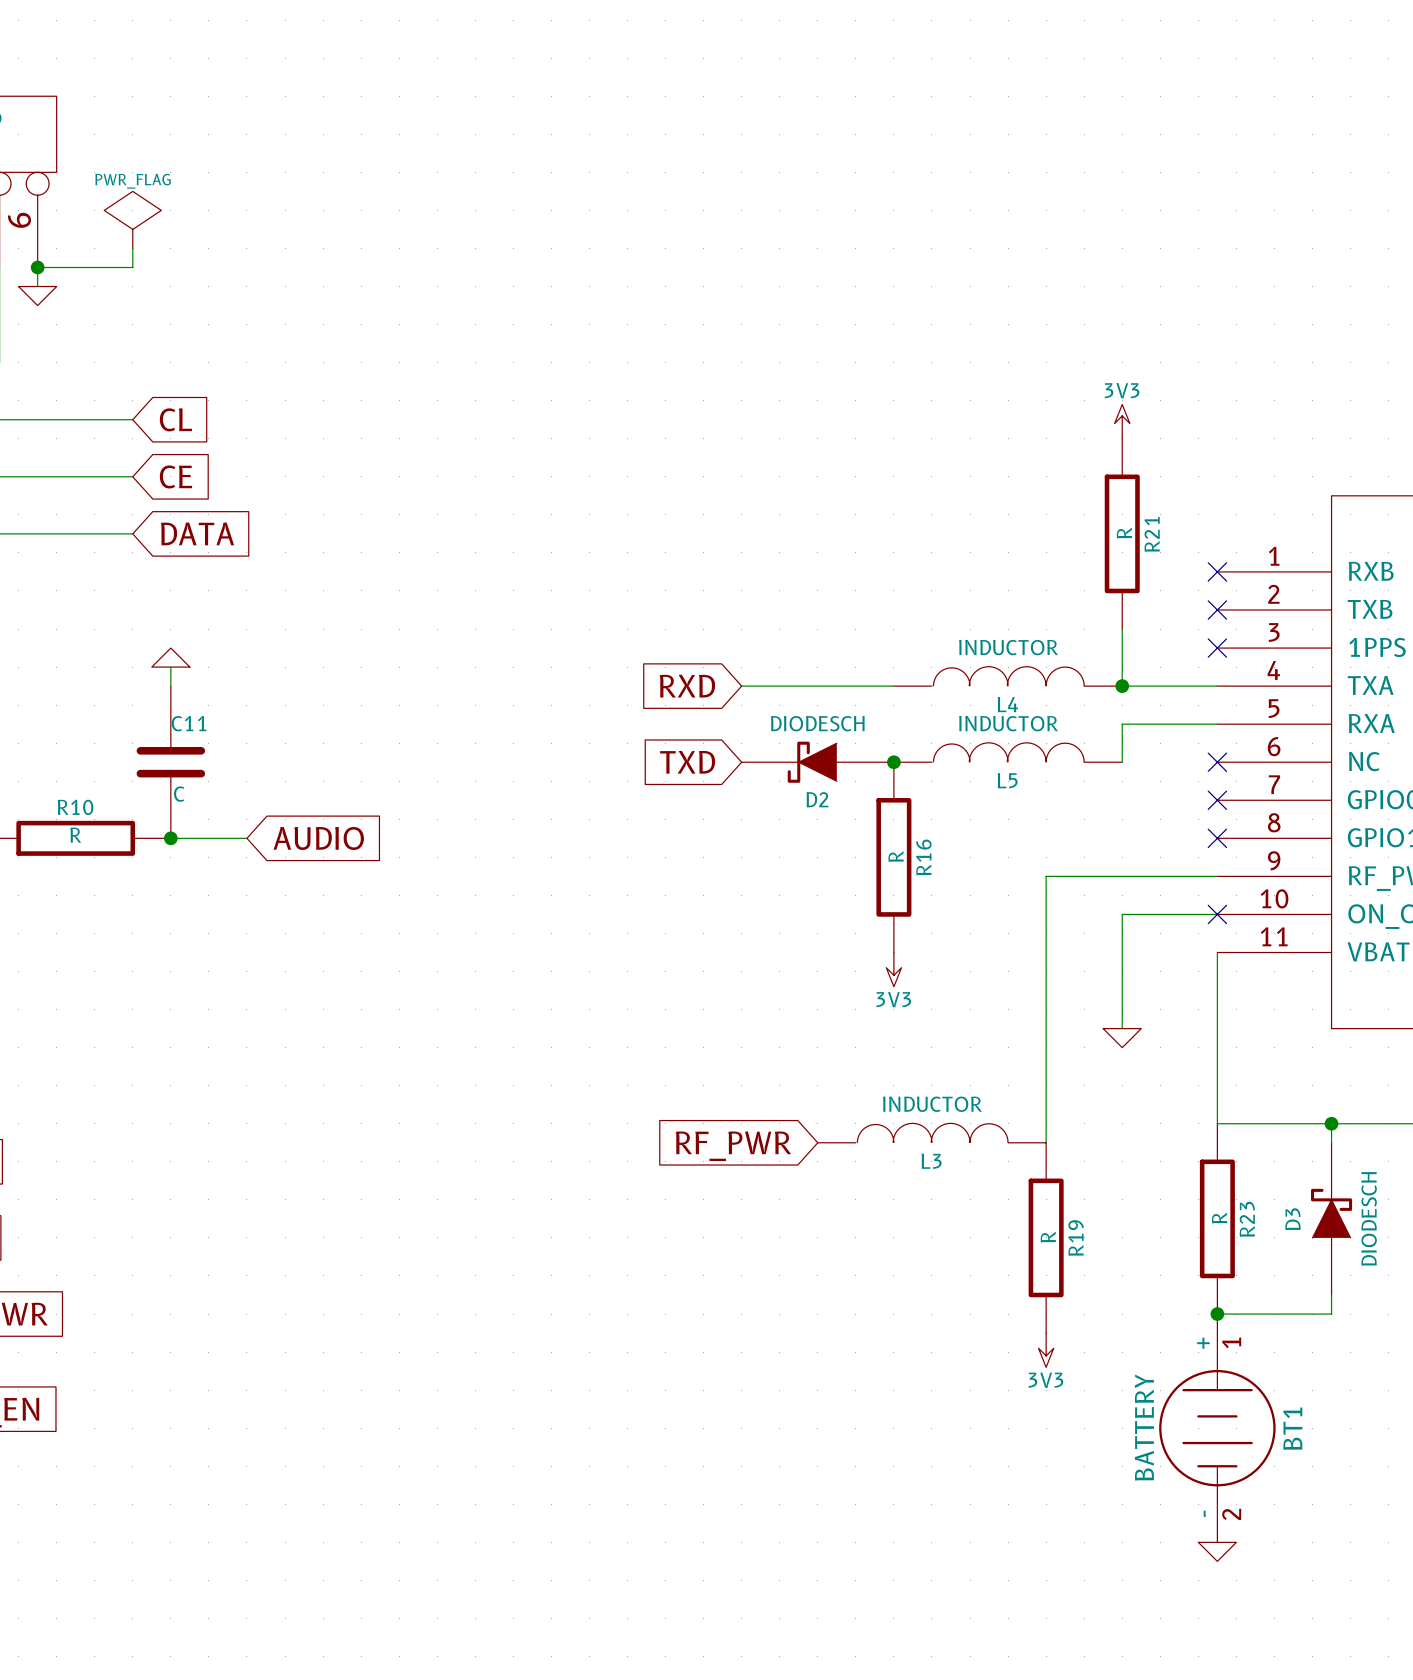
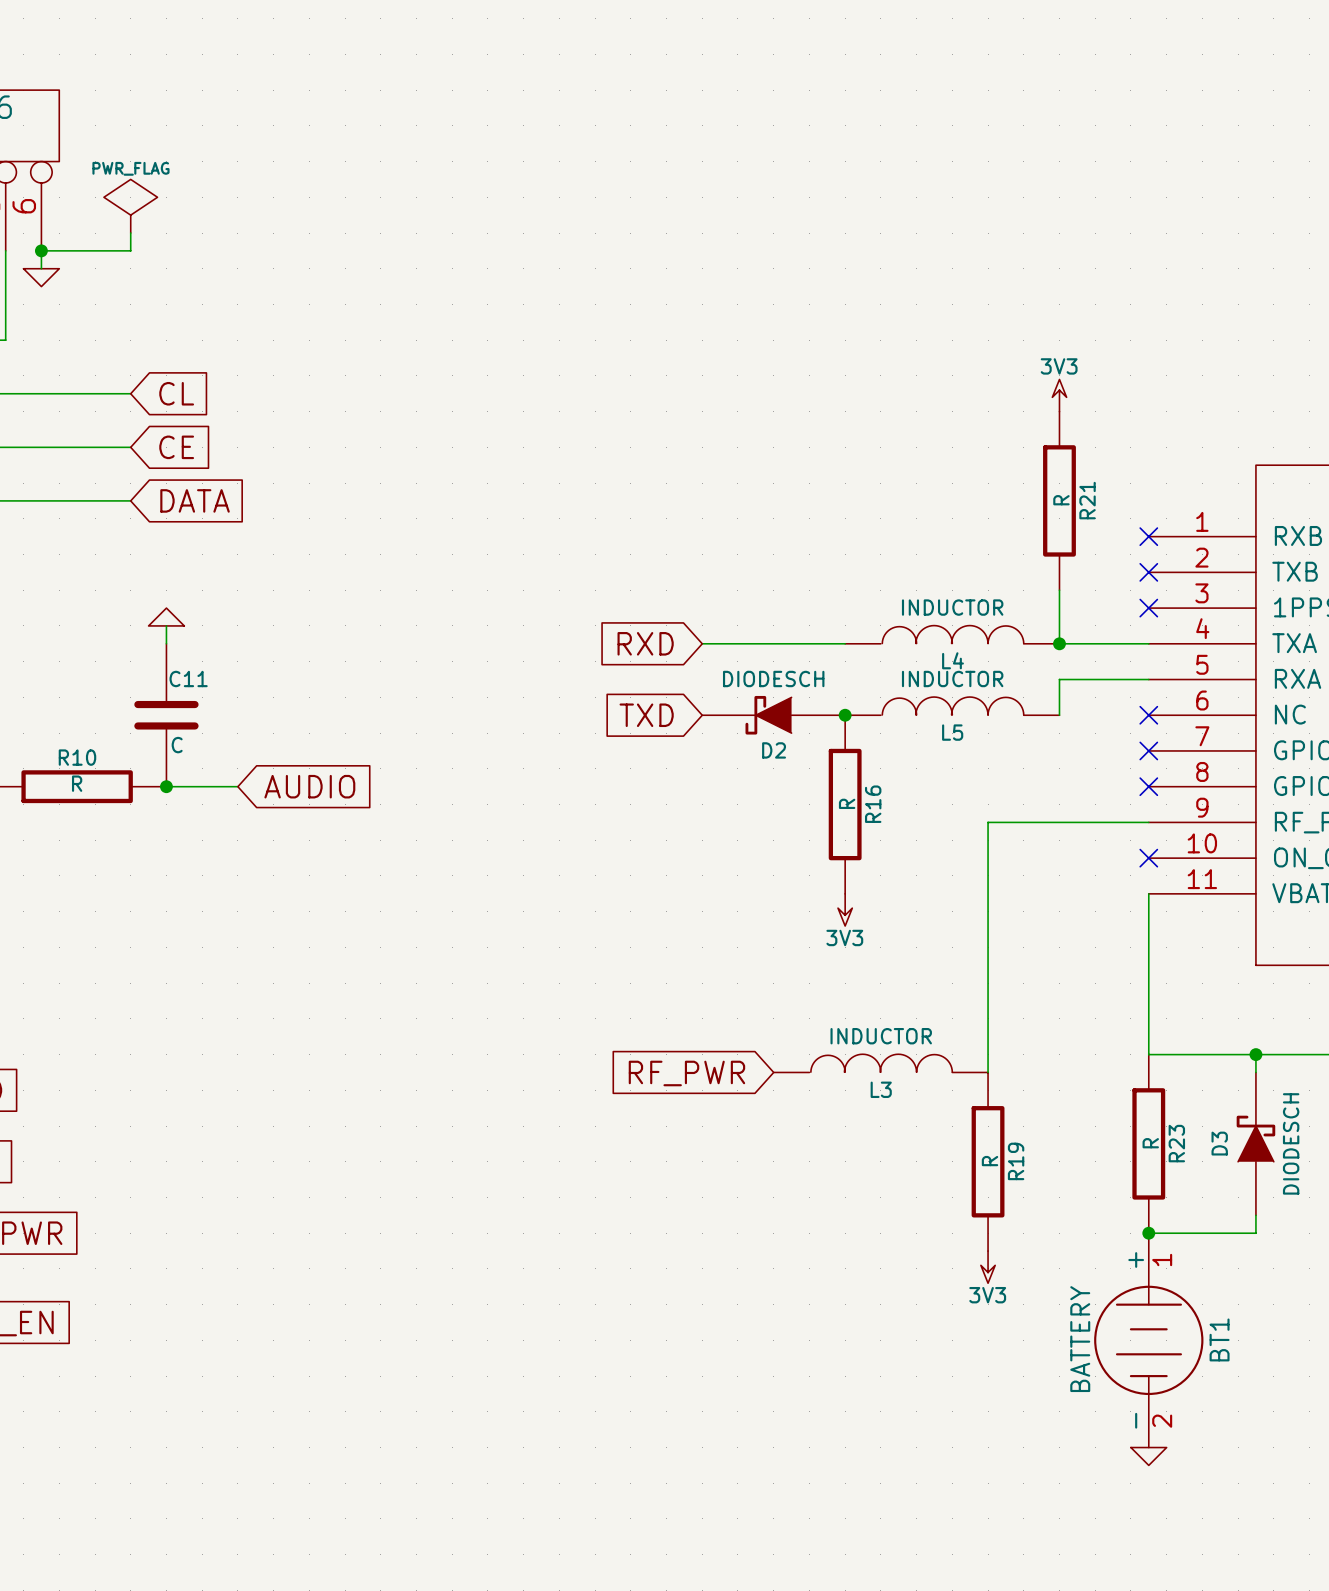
wire: (1217, 914) (1122, 914) (1122, 1028) -> none
power symbol: (1122, 1038) -> none

